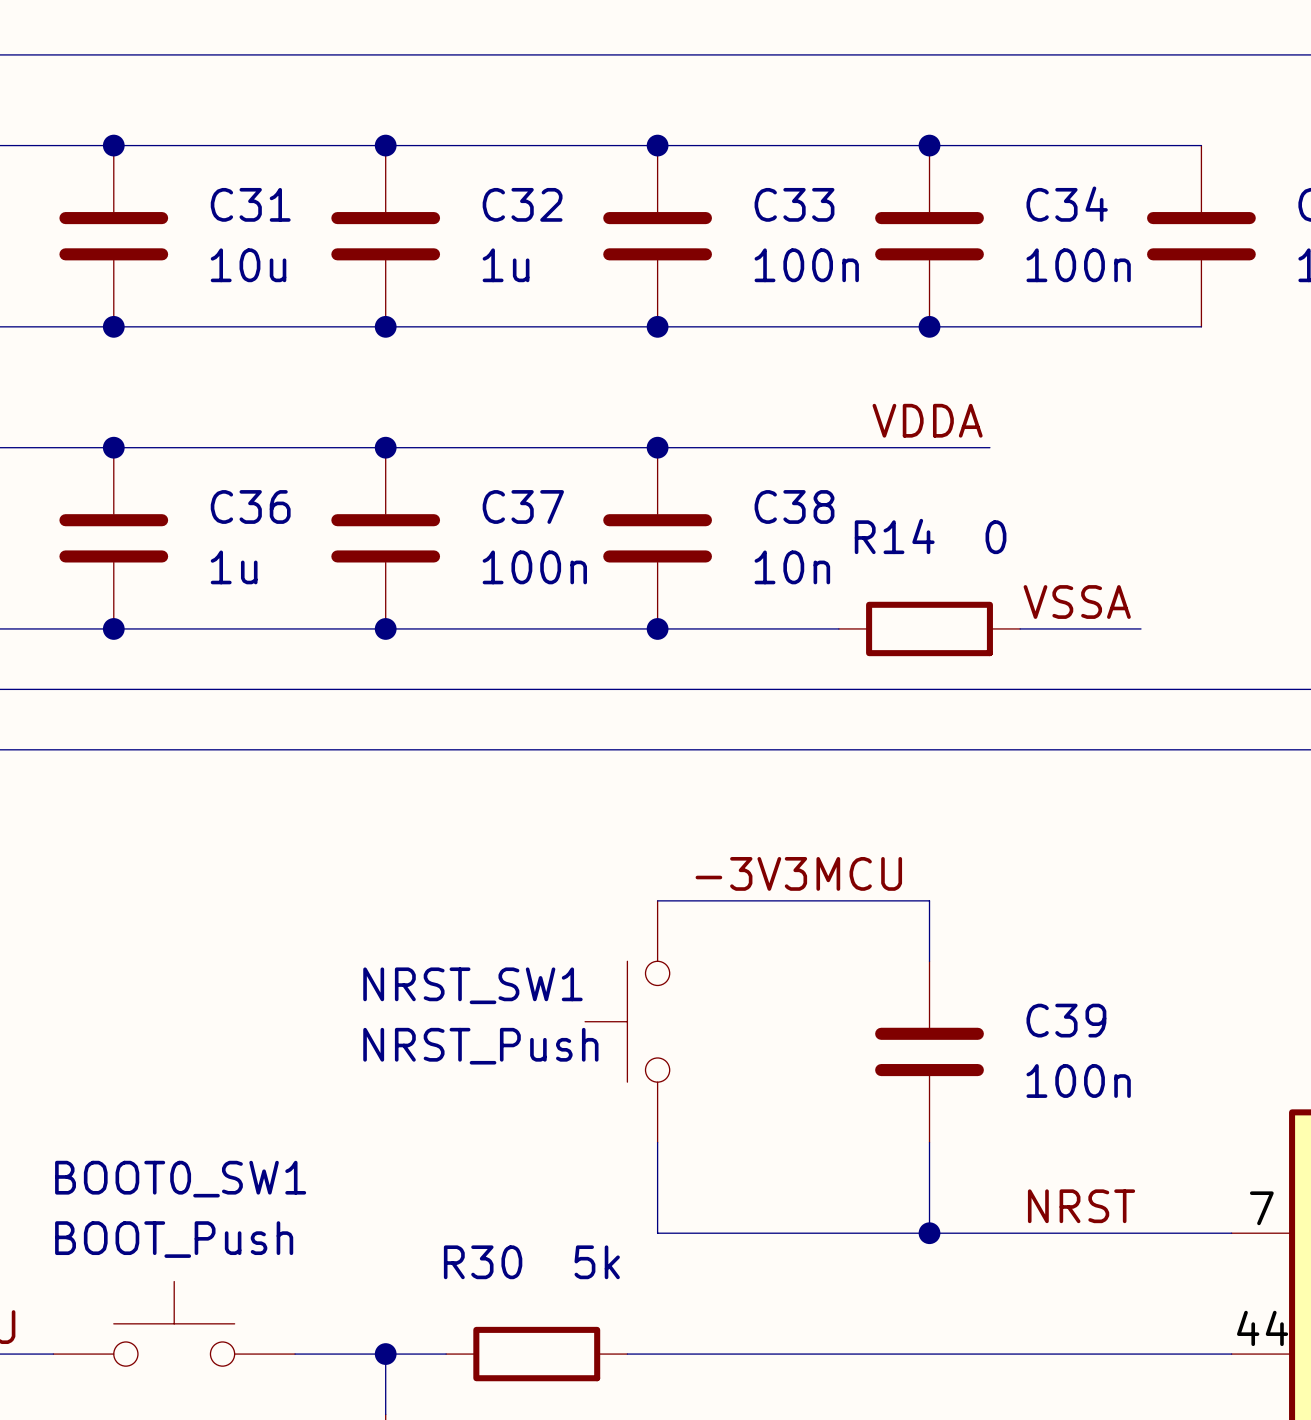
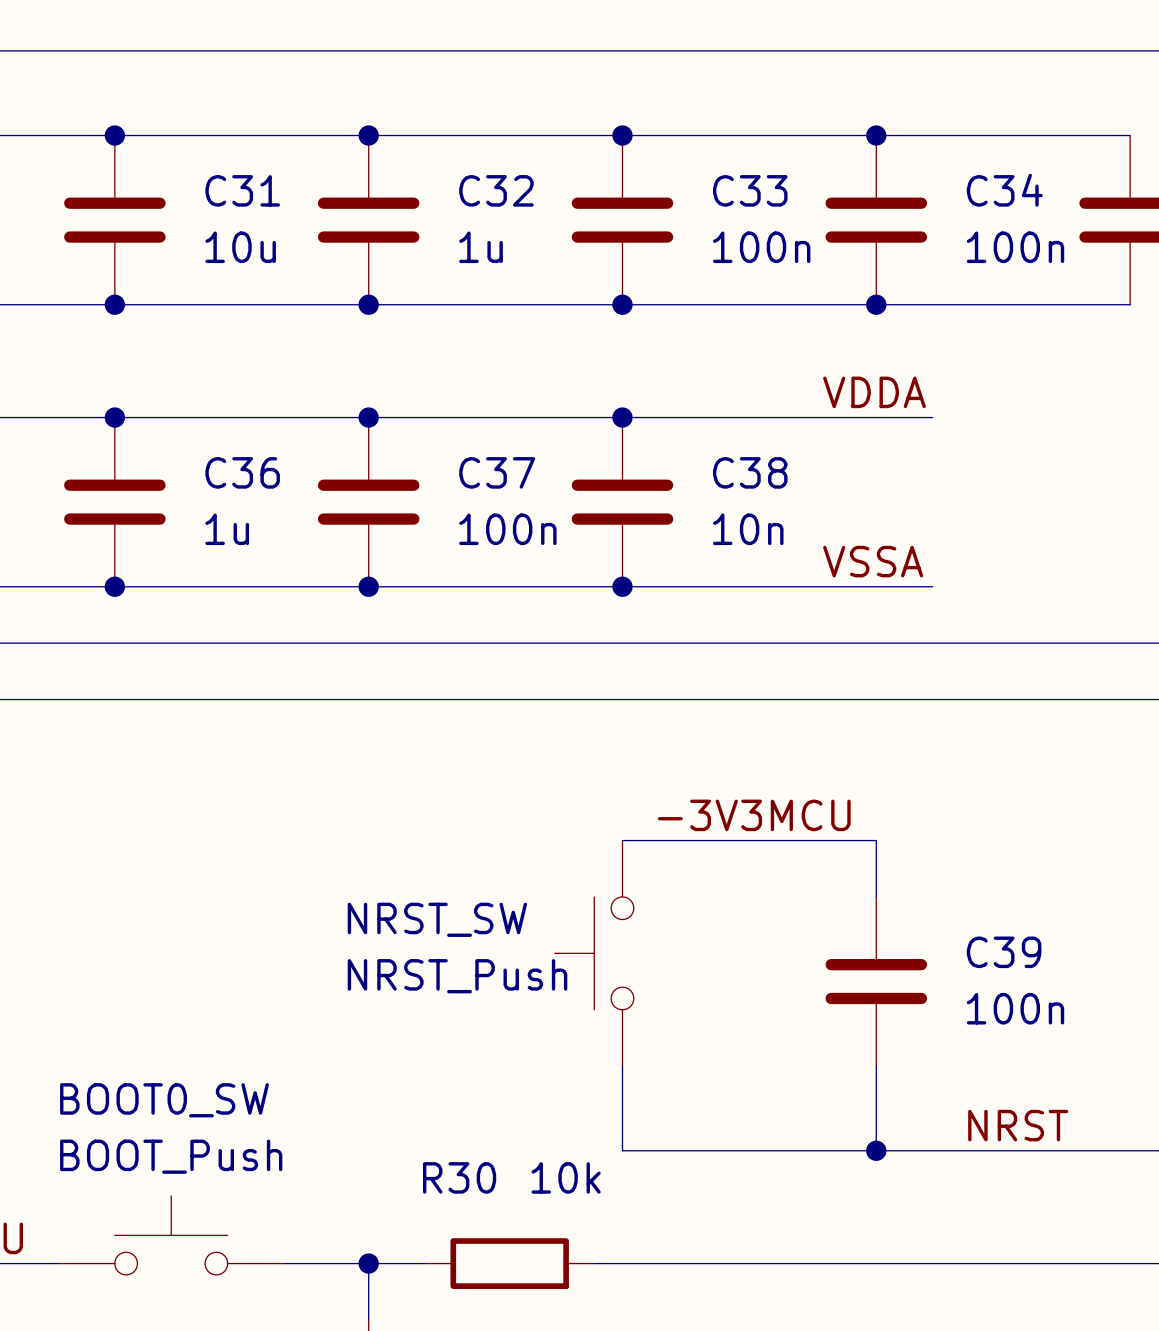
label position: VSSA (1077, 602) -> VSSA (873, 561)
wire: none -> (791, 586) (932, 586)
R14: 0 (929, 628) -> none
wire: (1020, 628) (1140, 628) -> none
NRST_SW1 name: NRST_SW1 (472, 985) -> NRST_SW (437, 919)
BOOT0_SW1 name: BOOT0_SW1 (180, 1179) -> BOOT0_SW (164, 1100)
R30 value: 5k (597, 1262) -> 10k (566, 1177)

